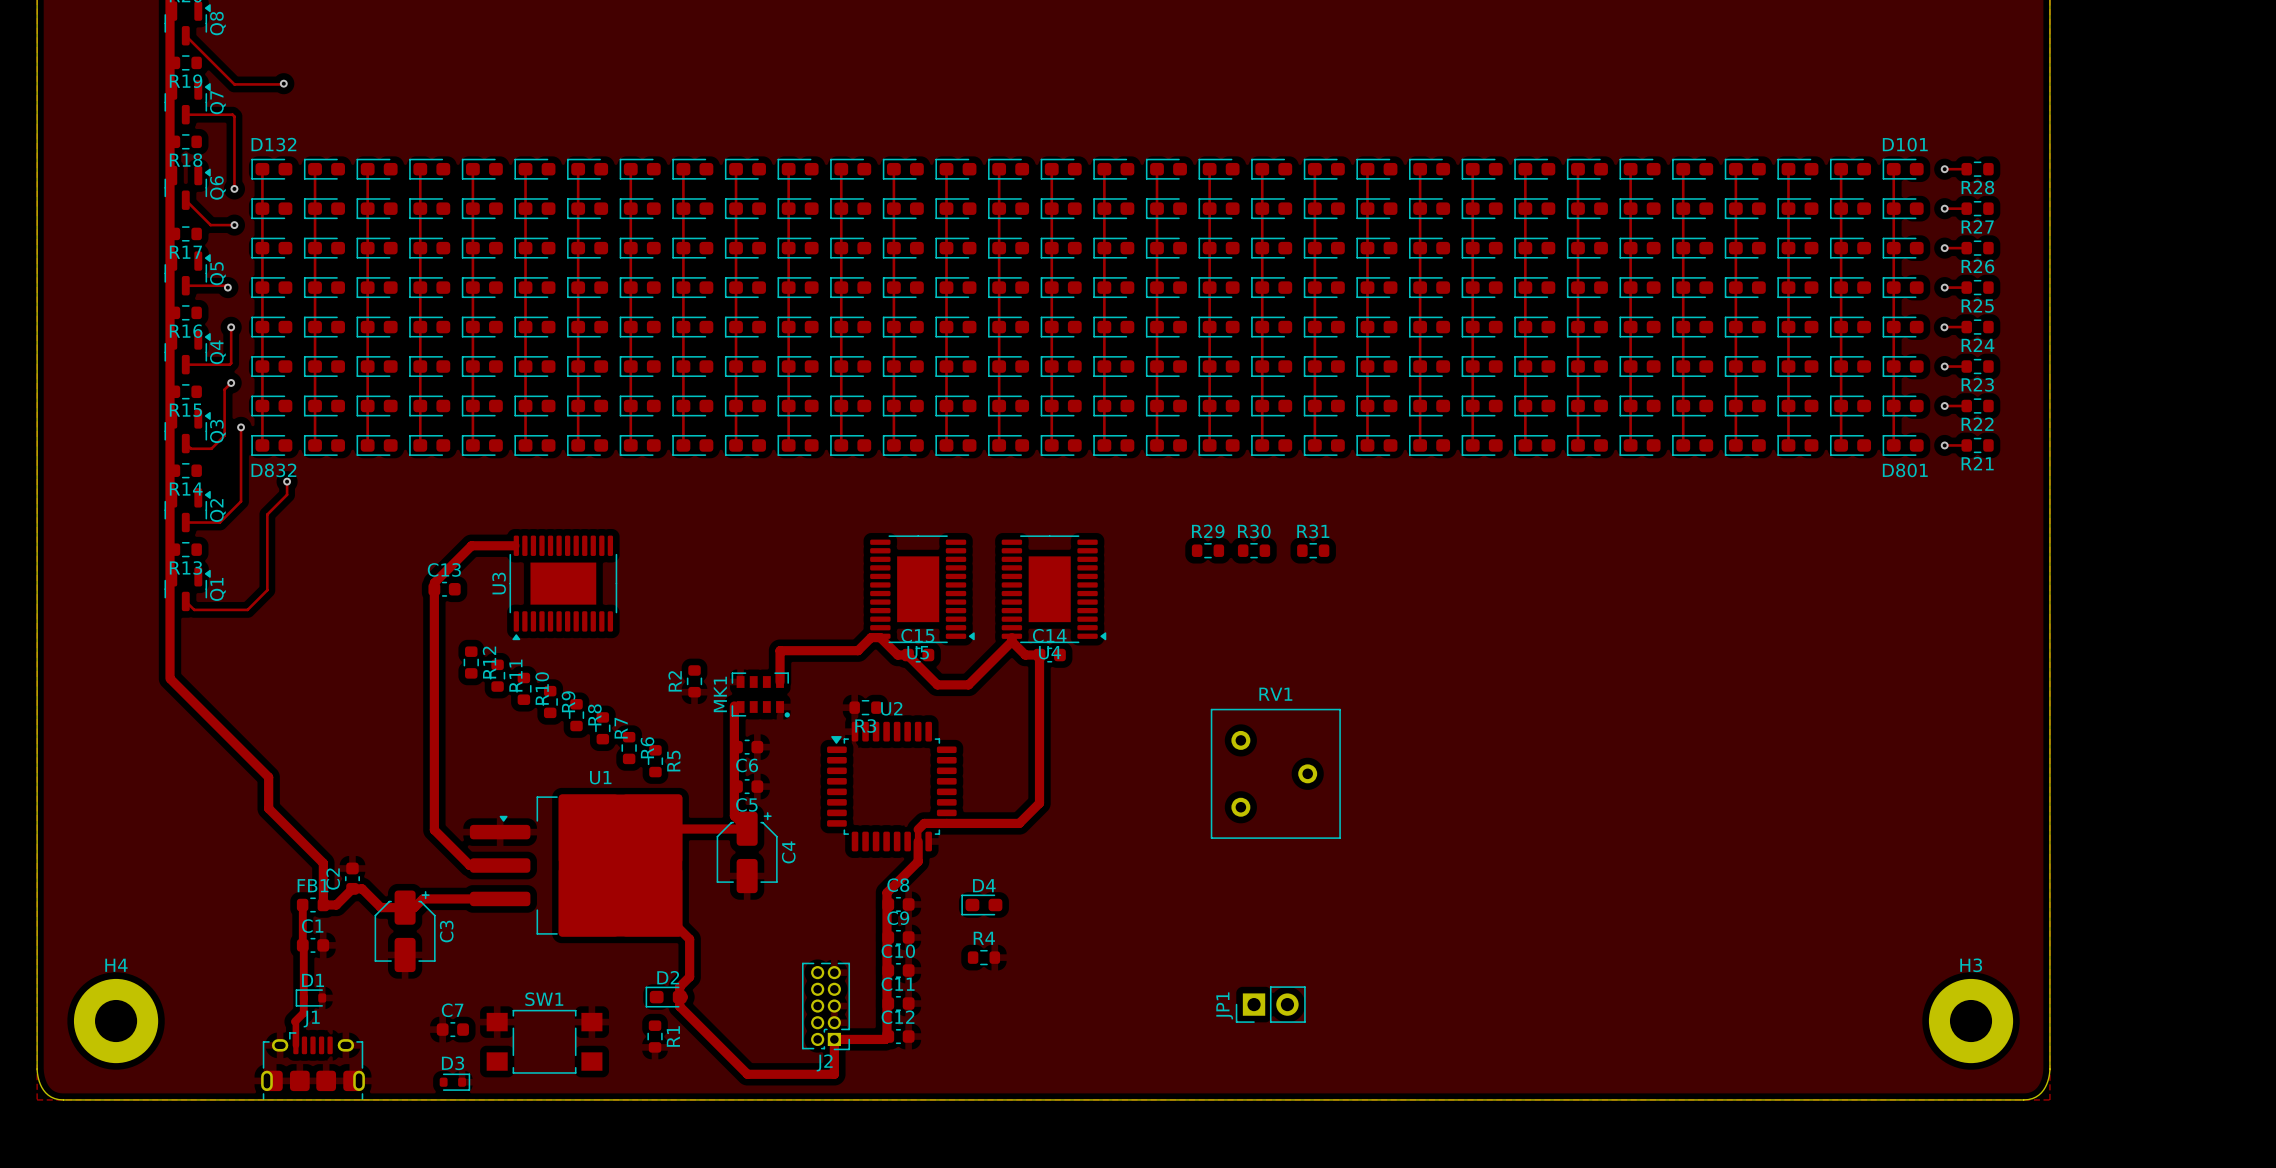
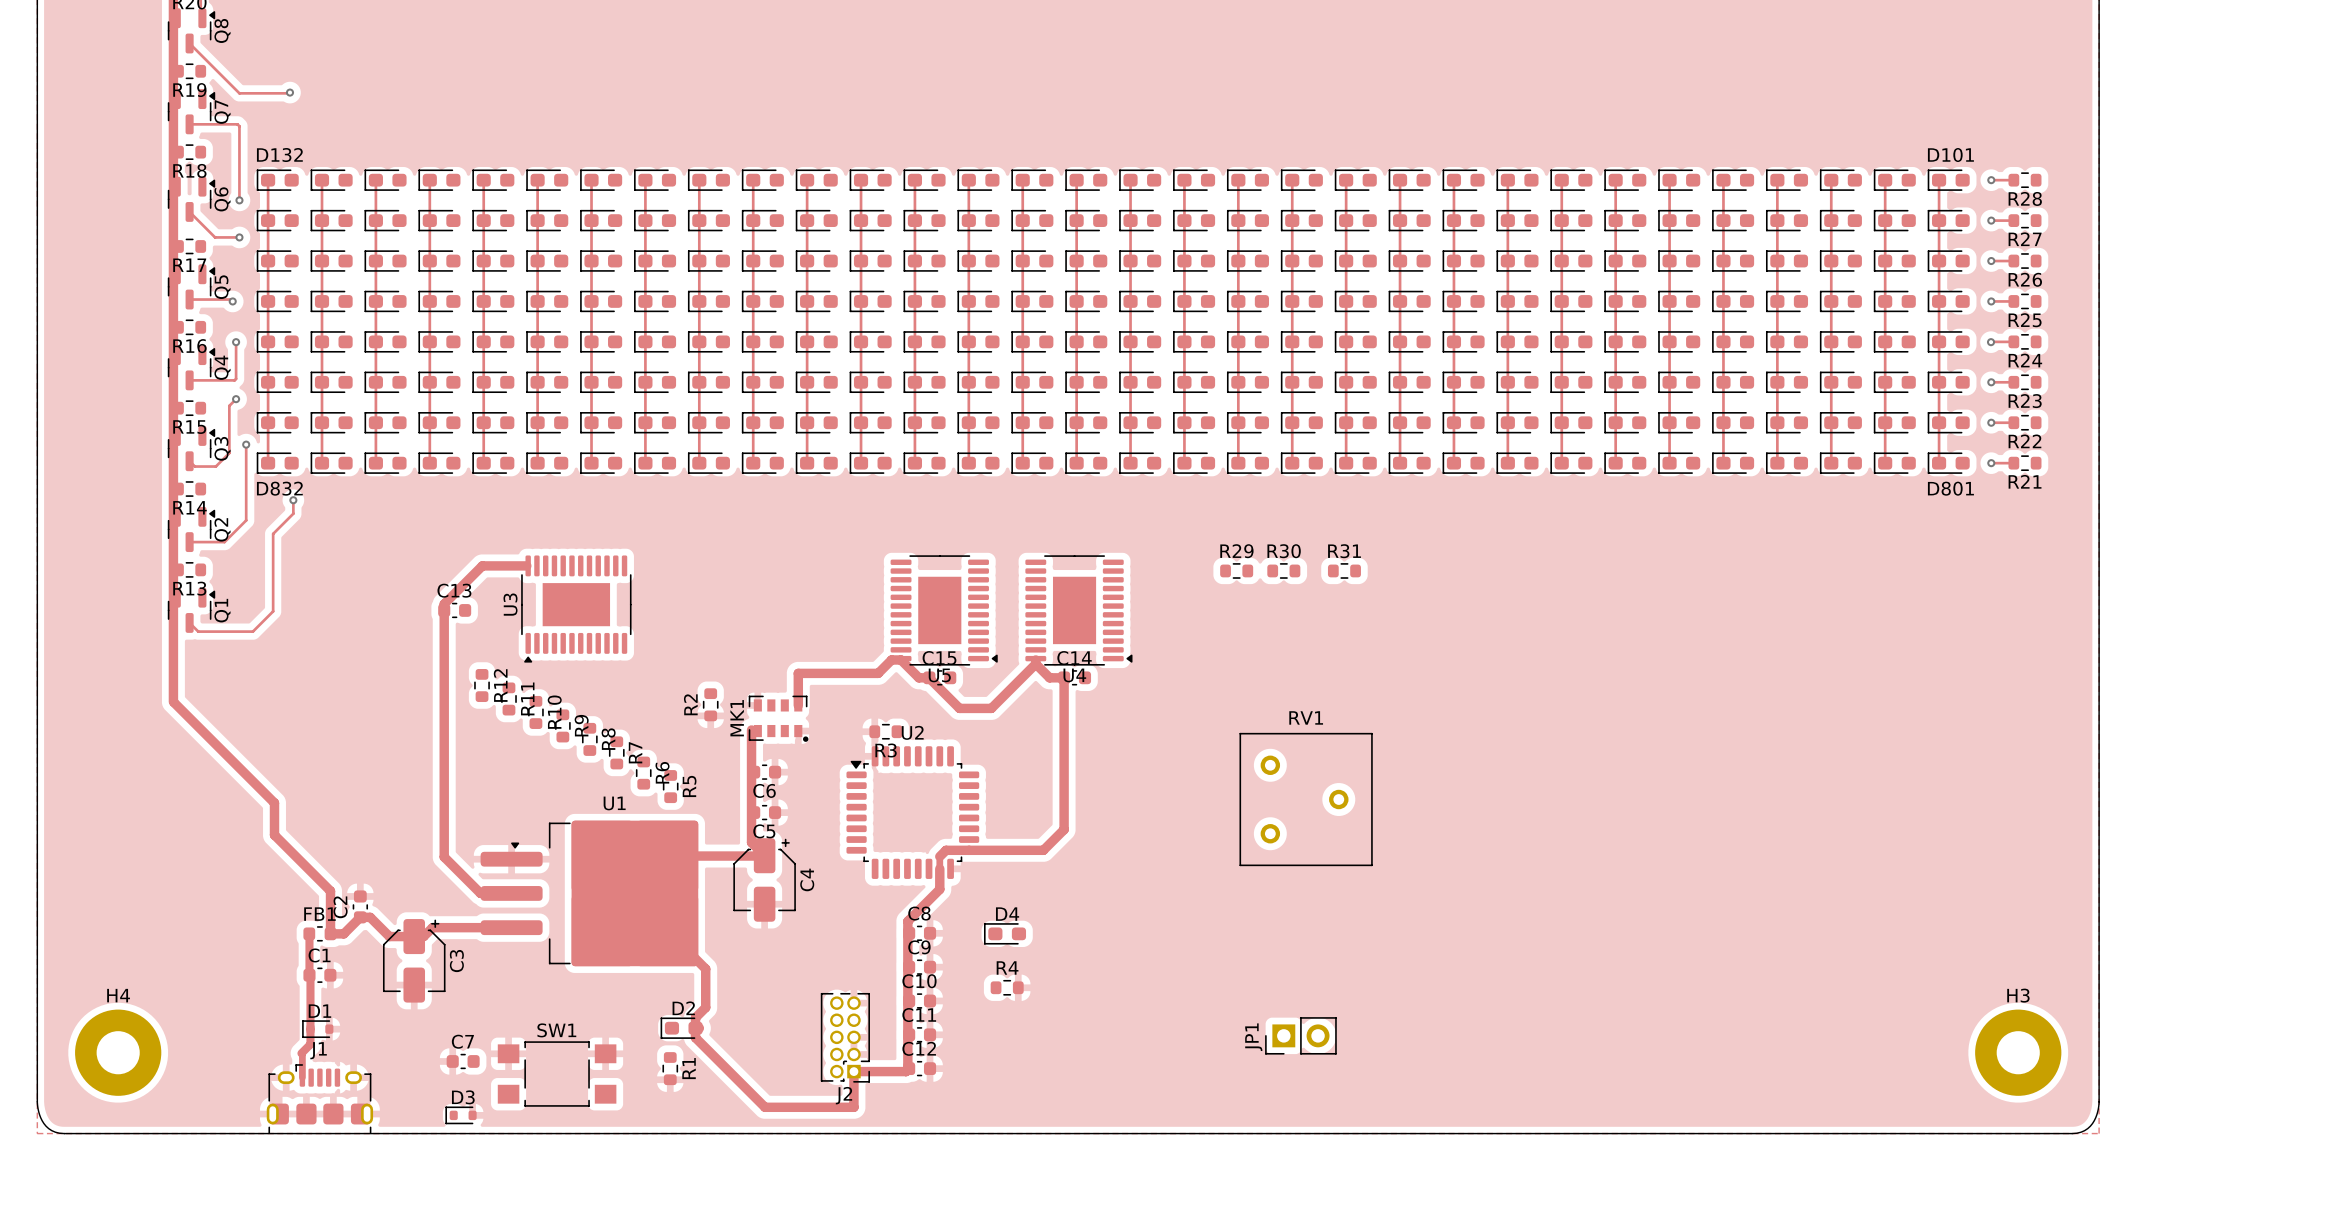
D3 rotation: 0° (454, 1082) -> 180° (461, 1115)

